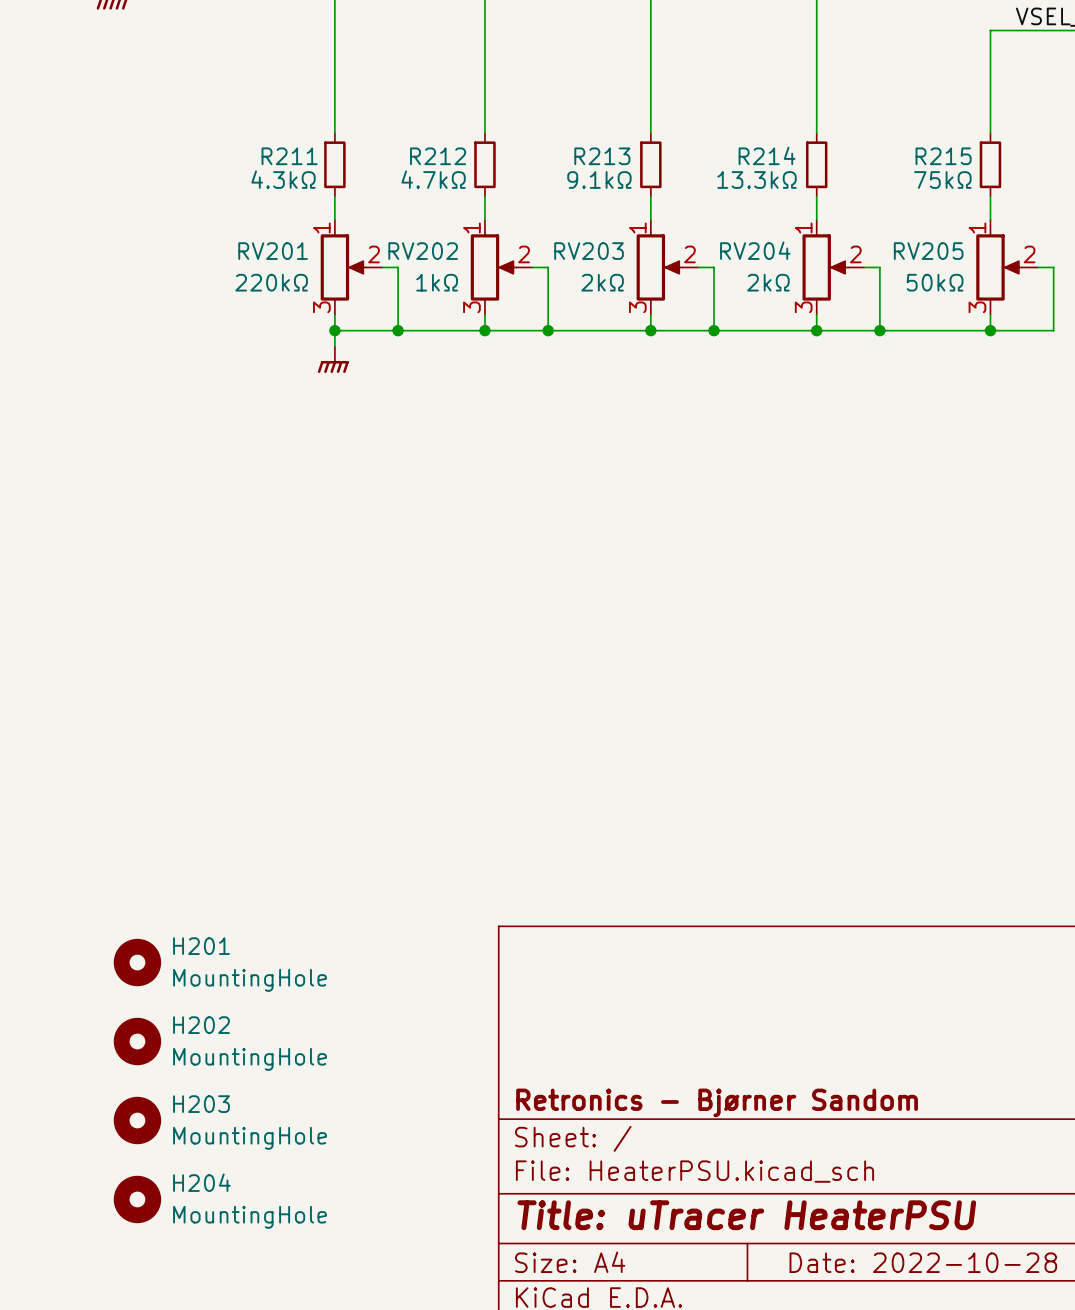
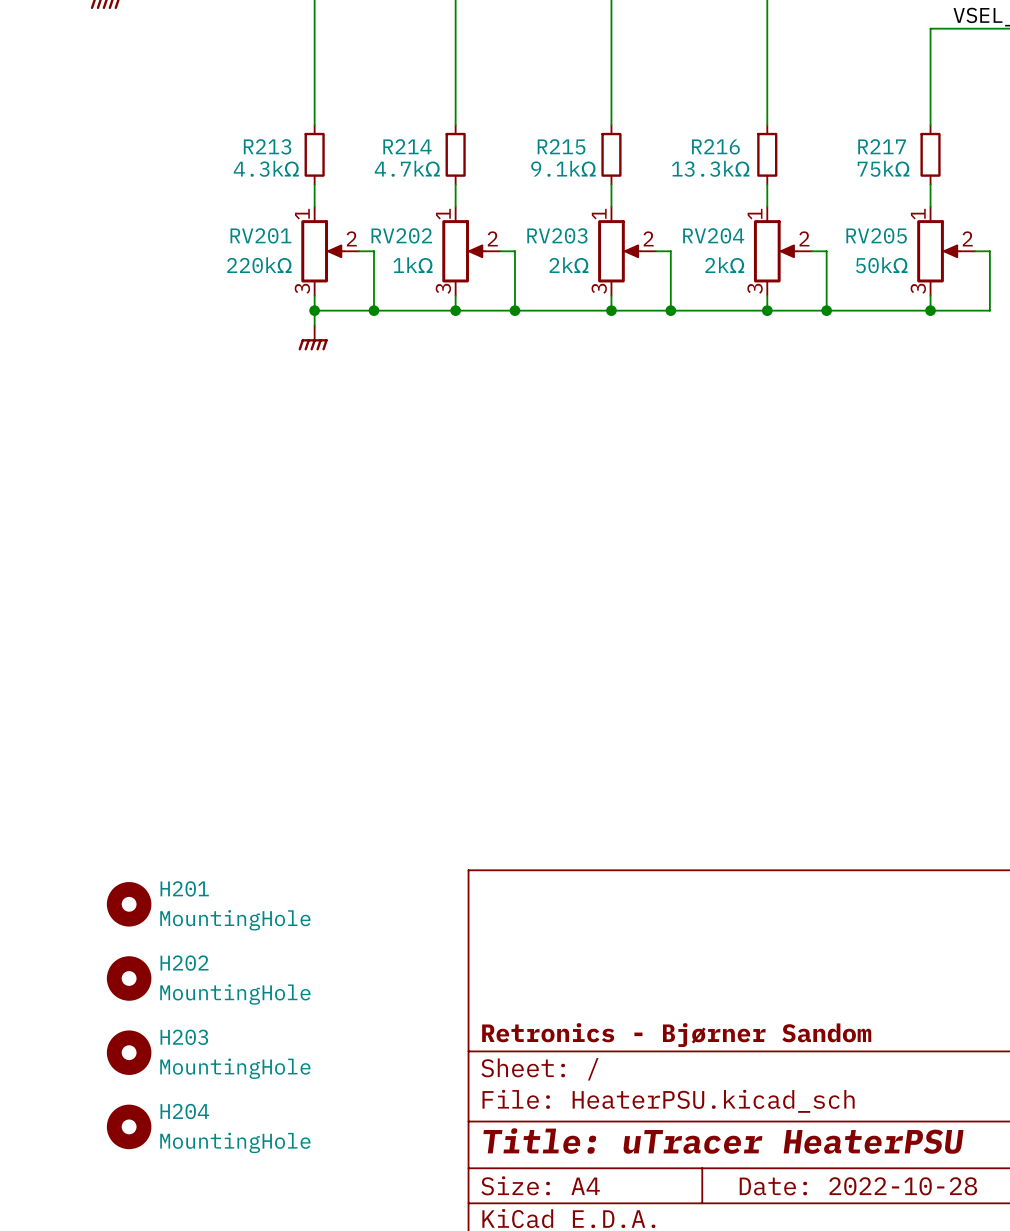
R214 name: R214 (767, 155) -> R216 (715, 146)
R211 name: R211 (289, 156) -> R213 (267, 146)
R212 name: R212 (438, 156) -> R214 (407, 146)
R213 name: R213 (602, 156) -> R215 (561, 146)
R215 name: R215 (943, 156) -> R217 (882, 146)

